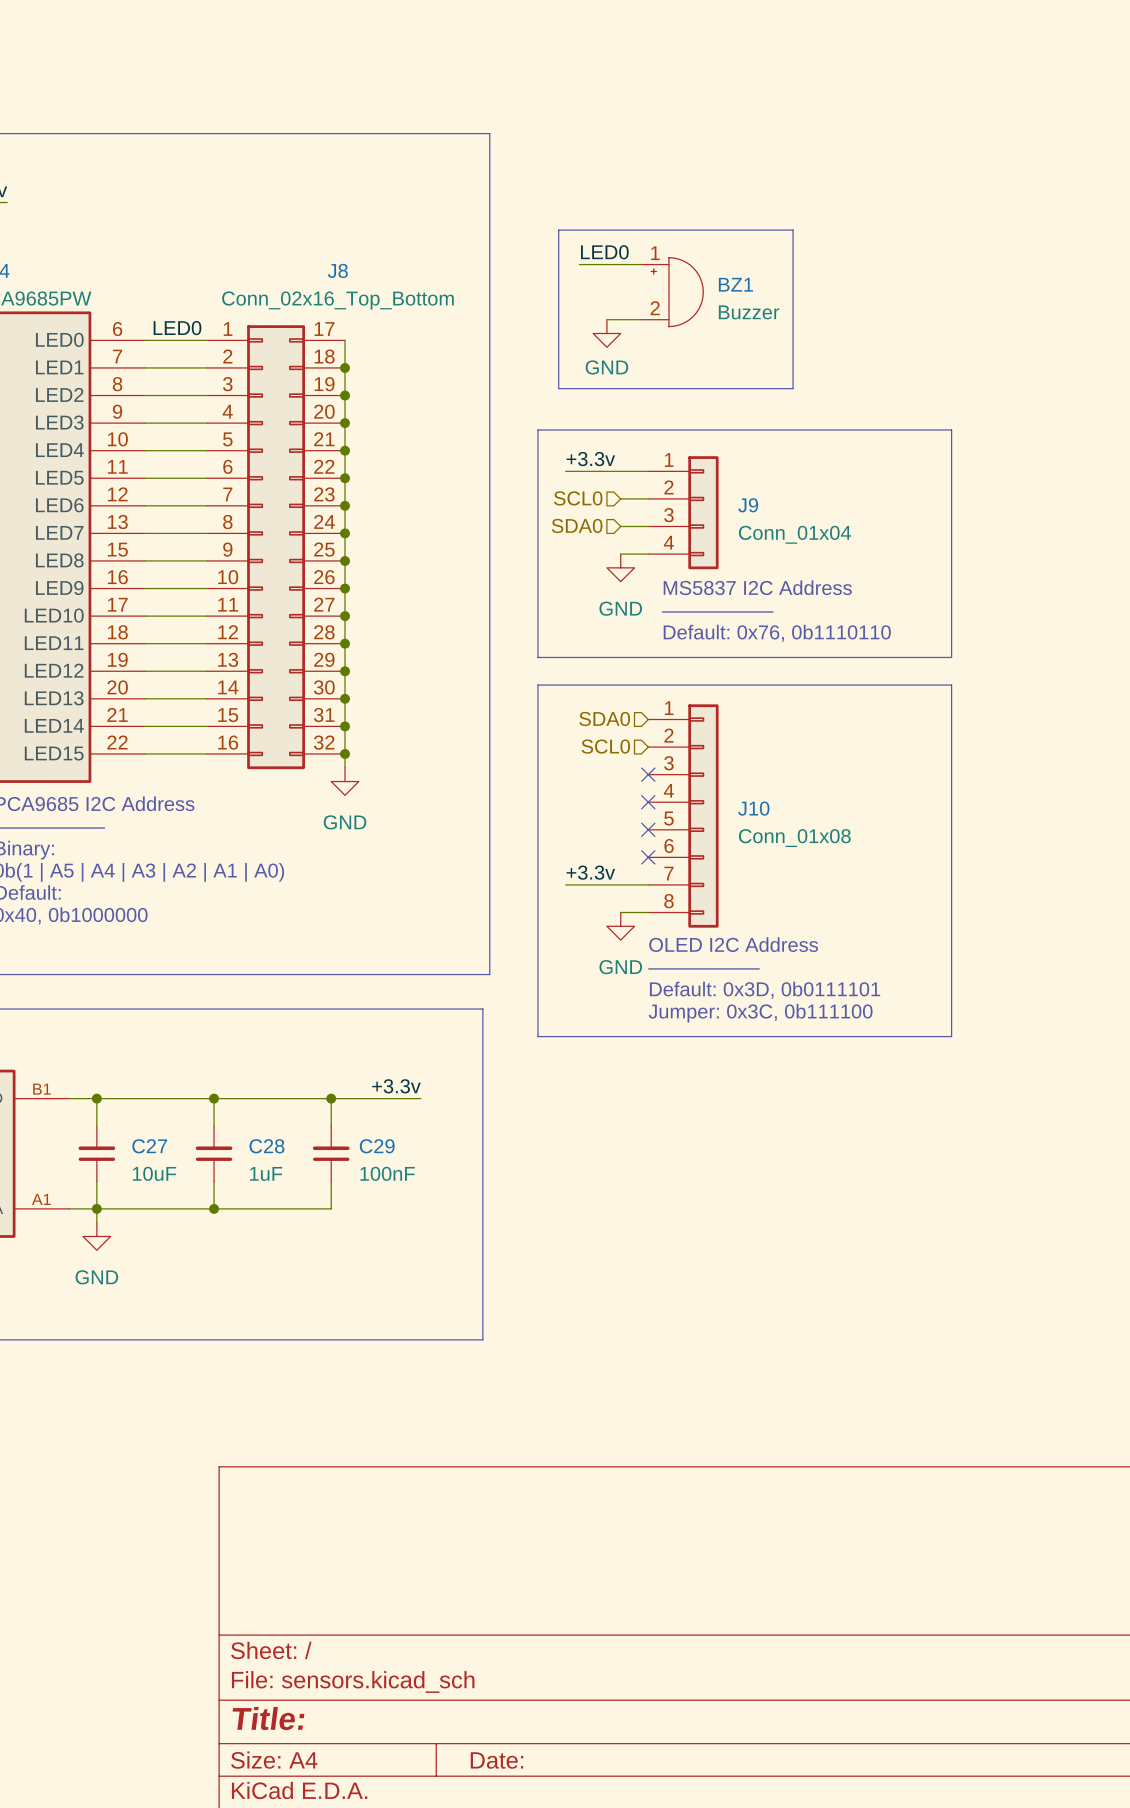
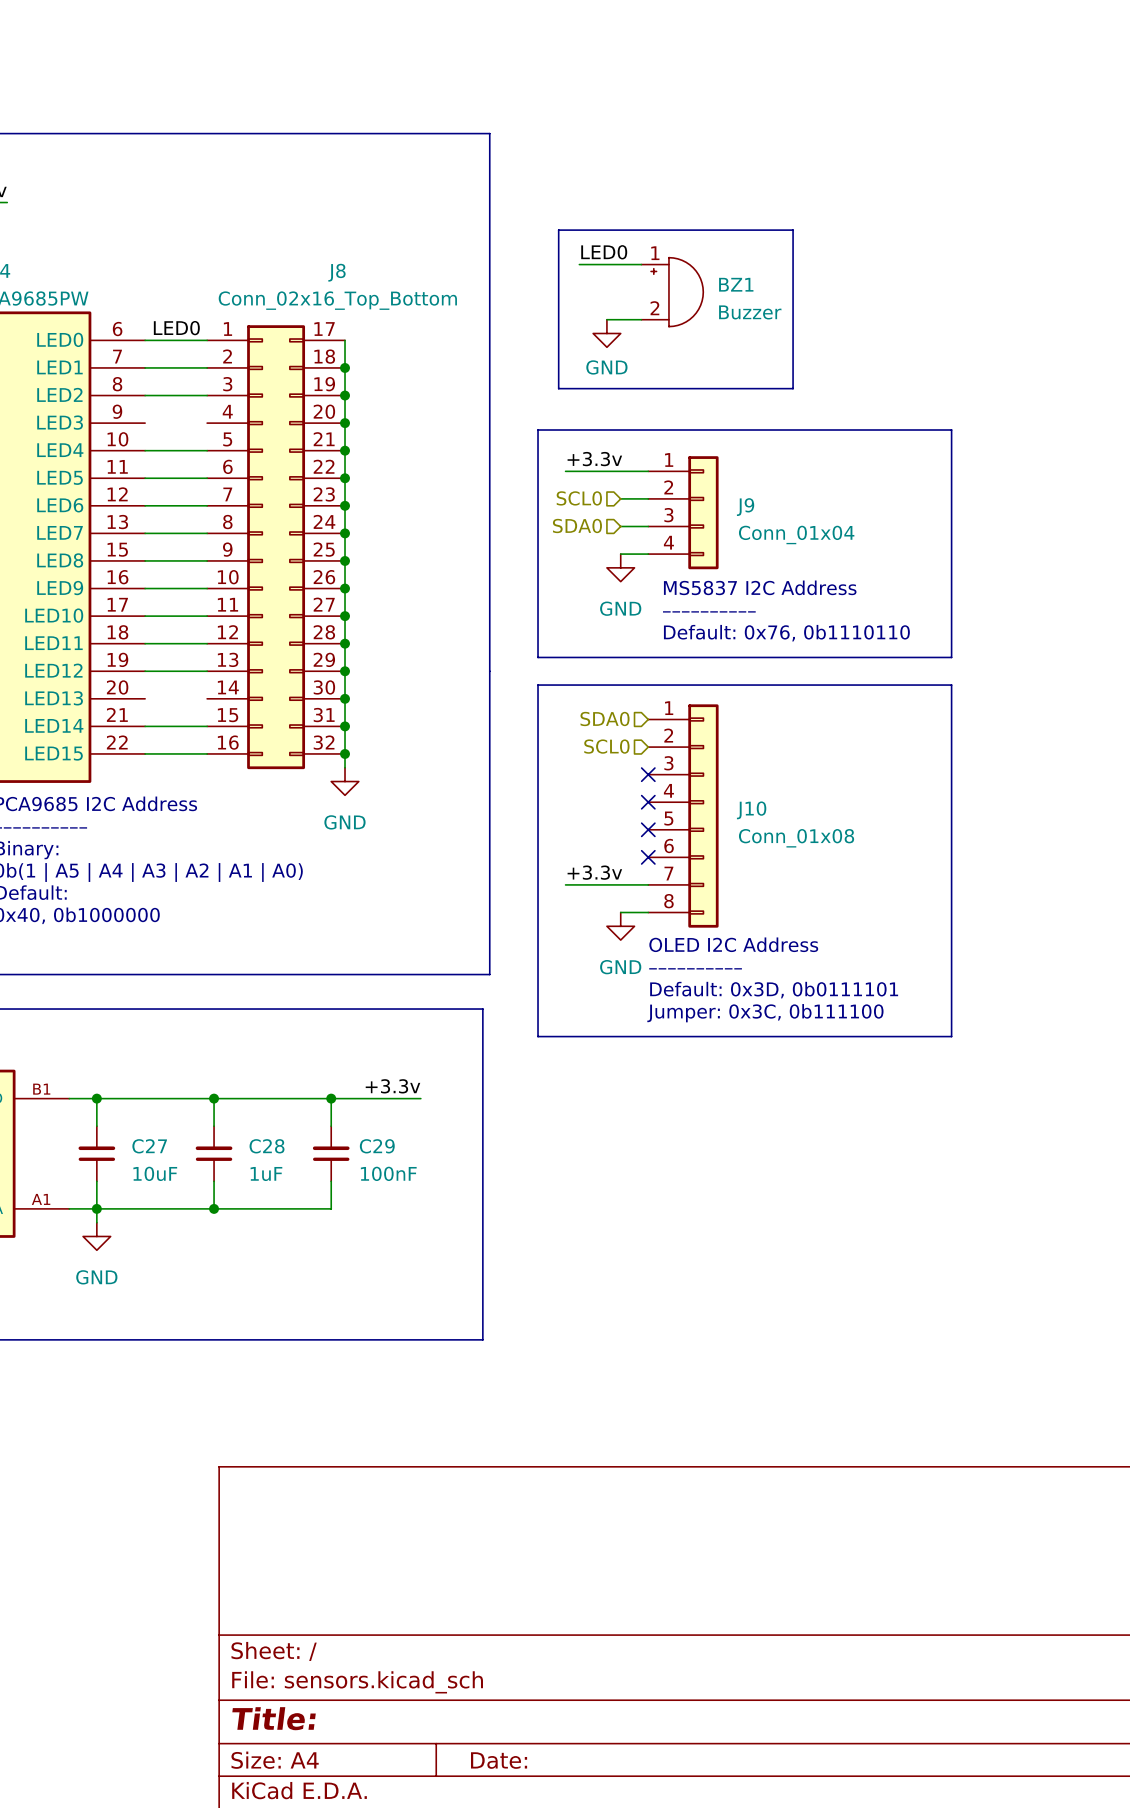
wire: (145, 423) (207, 423) -> none
wire: (145, 698) (207, 698) -> none

